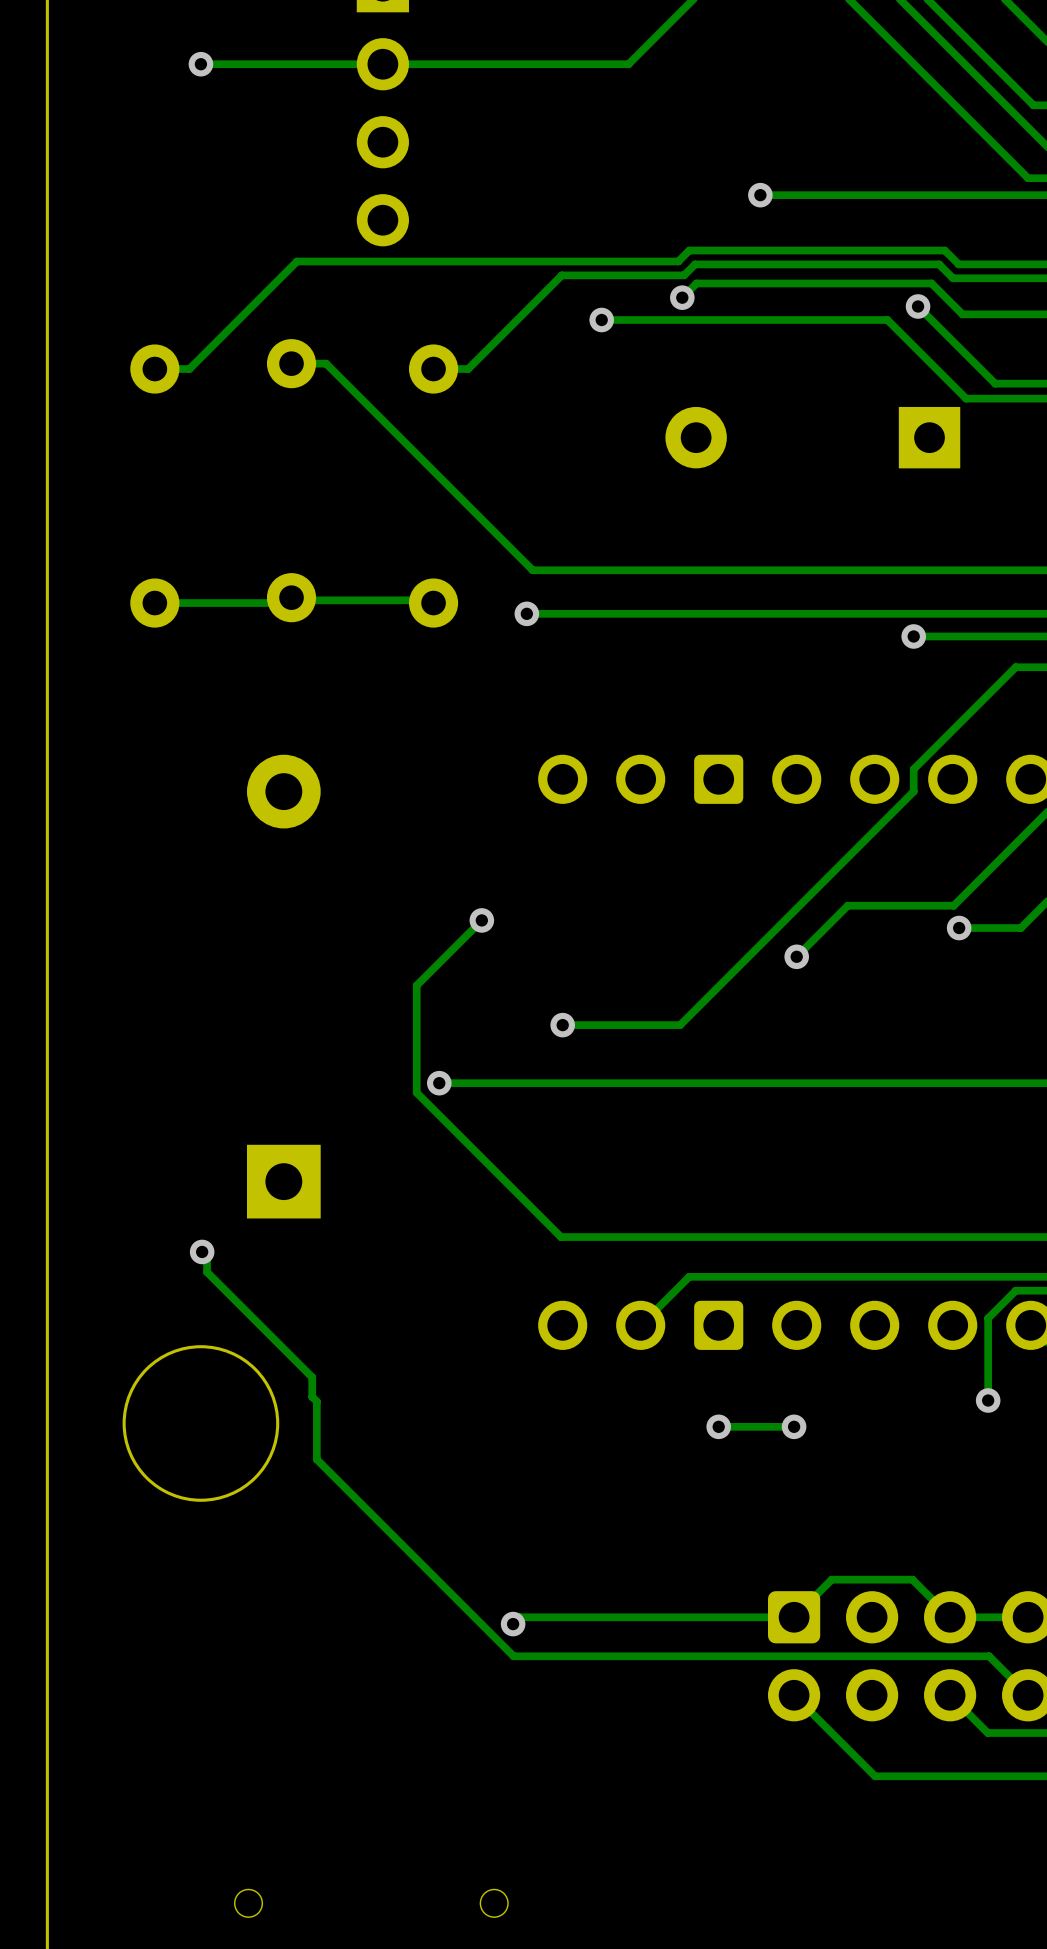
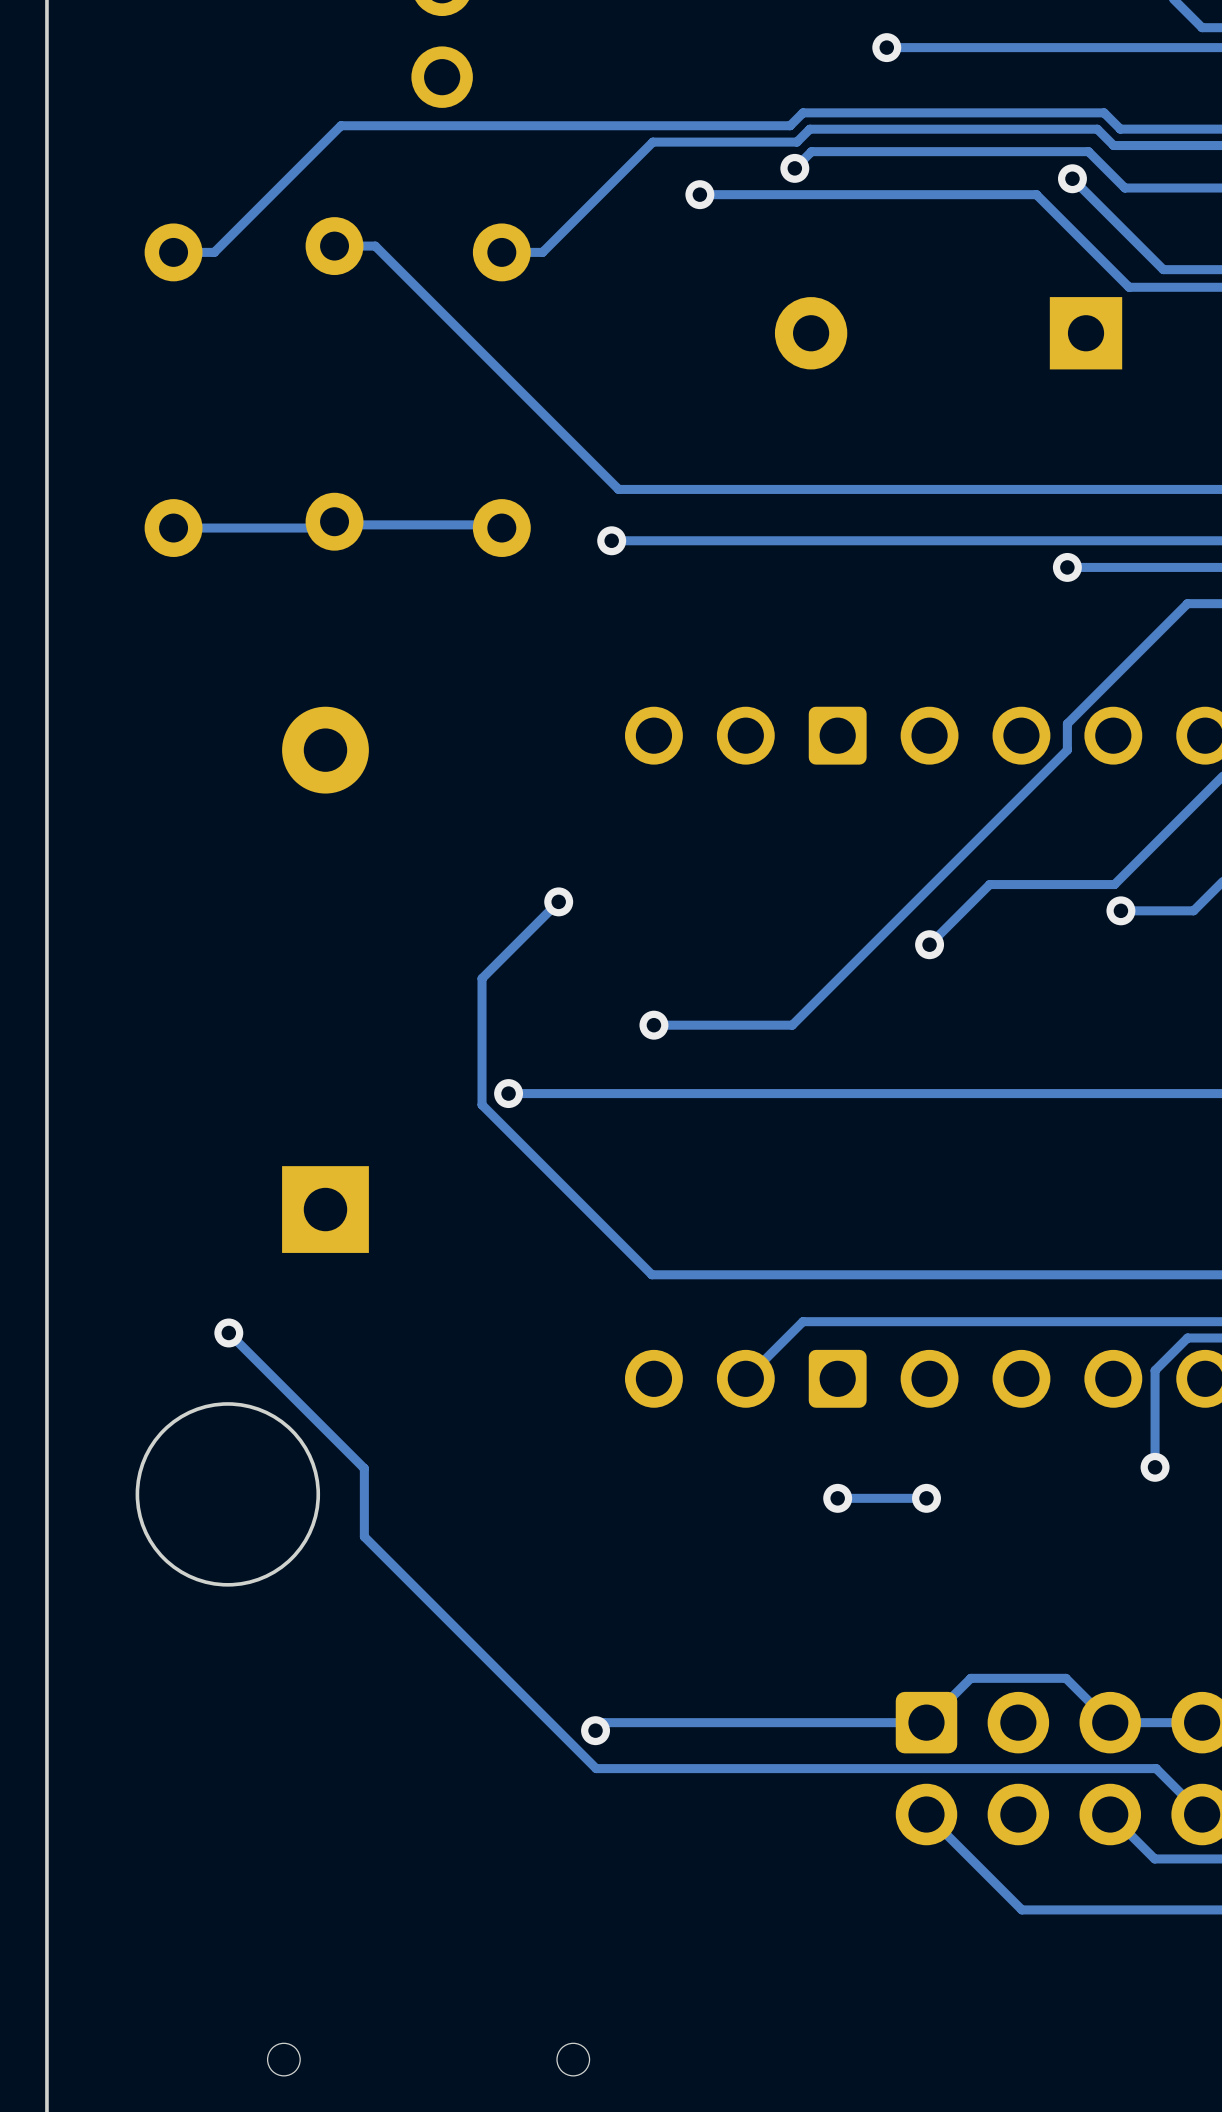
track: (207, 1250) (207, 1272) (312, 1377) (312, 1396) -> (228, 1332) (358, 1463)
via position: (202, 1251) -> (228, 1332)

